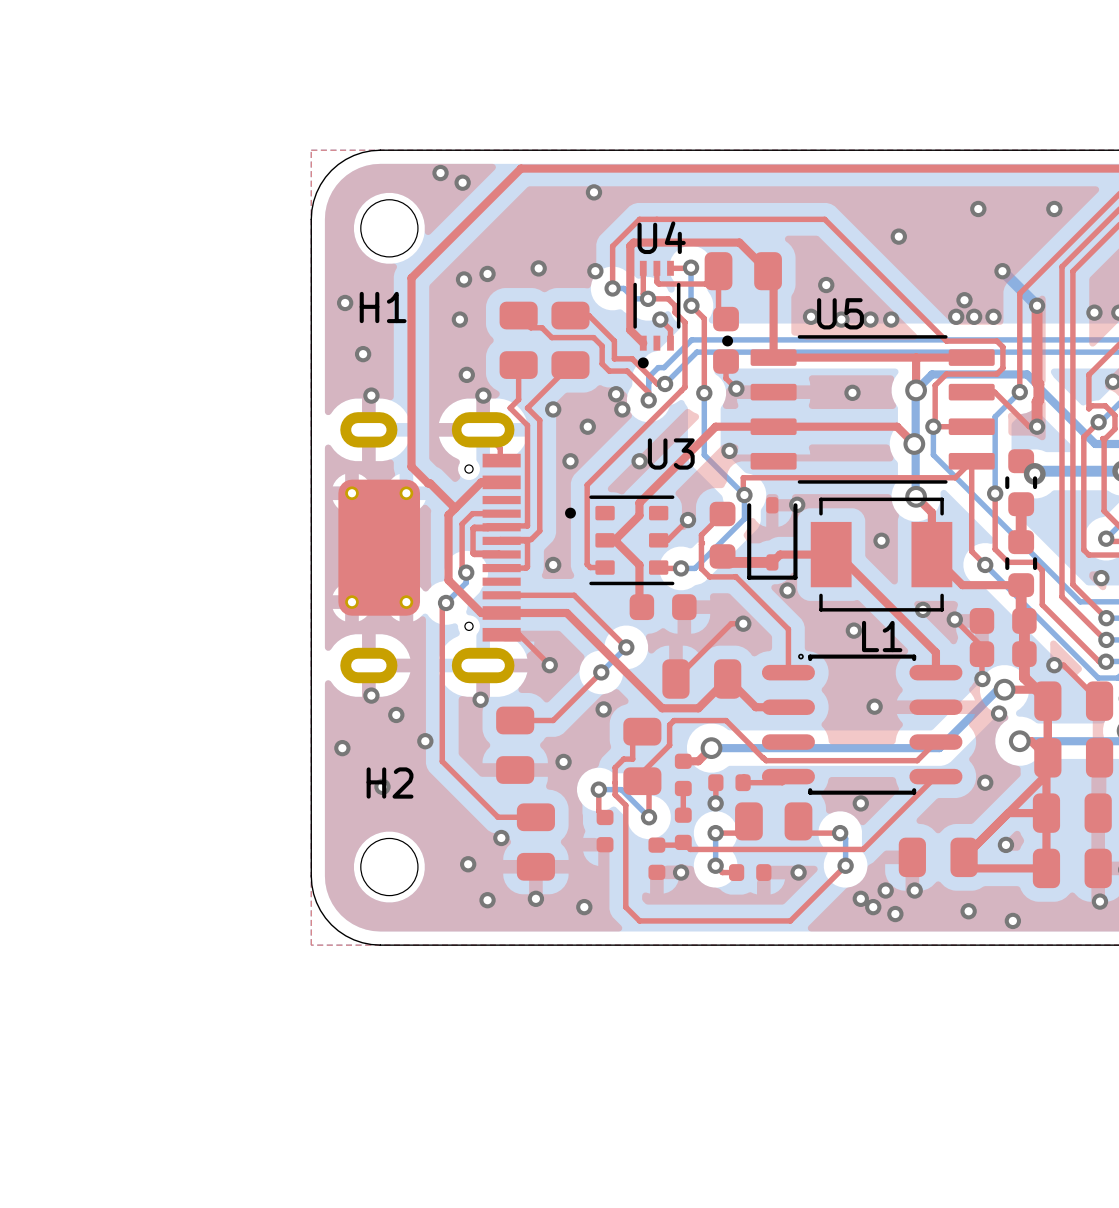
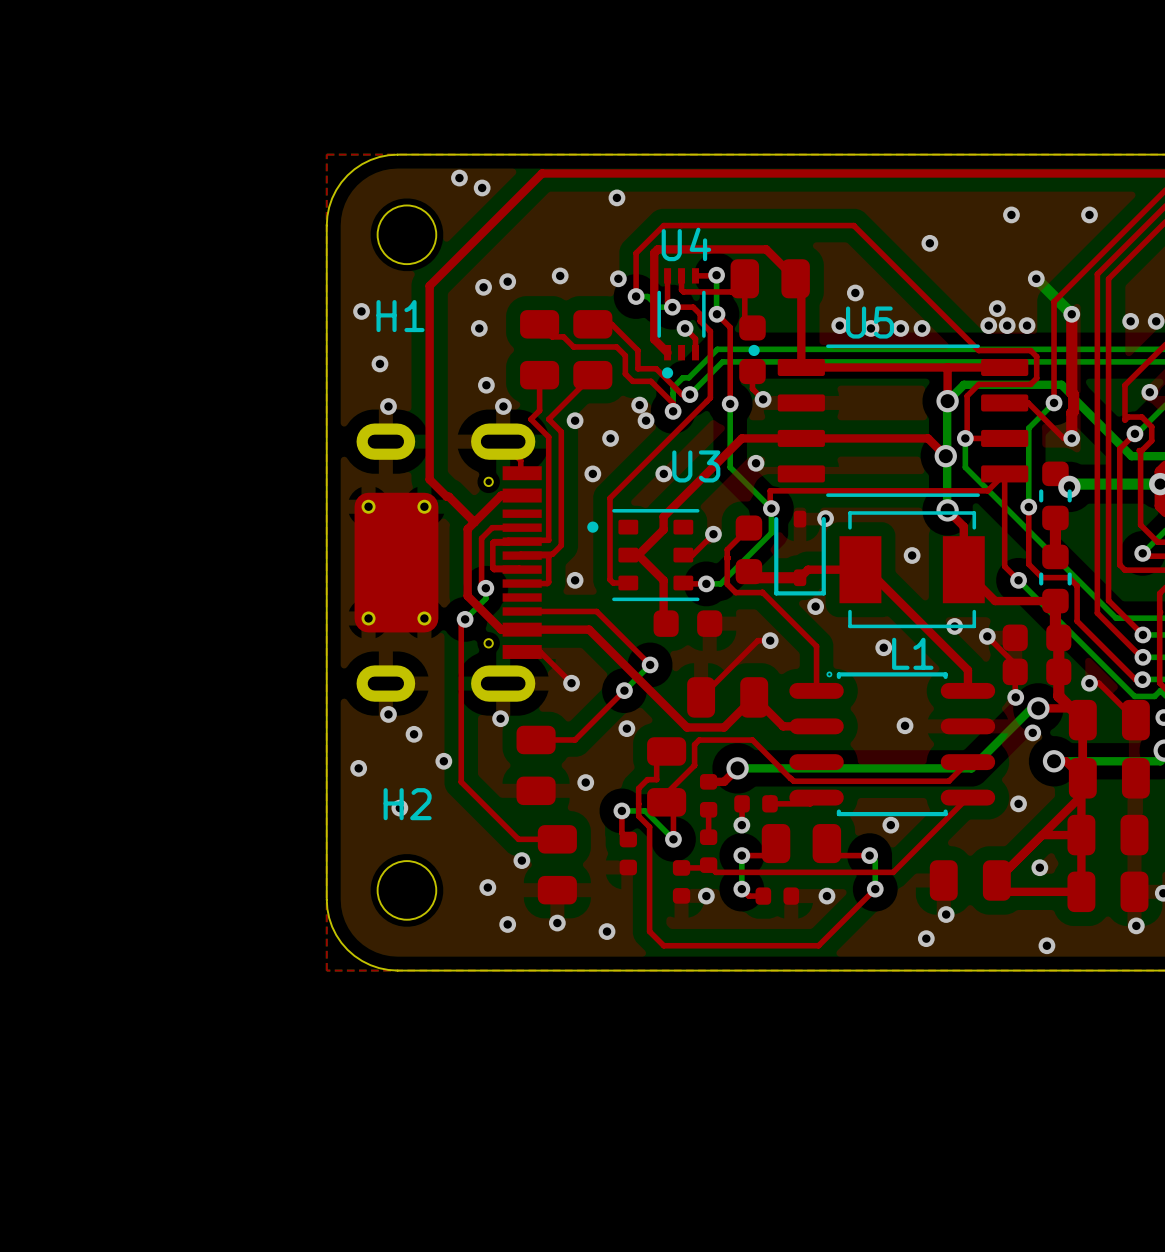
via: (852, 392) -> none
via: (1101, 578) -> none
via: (885, 890) -> none
via: (860, 898) -> none
via: (873, 907) -> none
via: (968, 911) -> none

